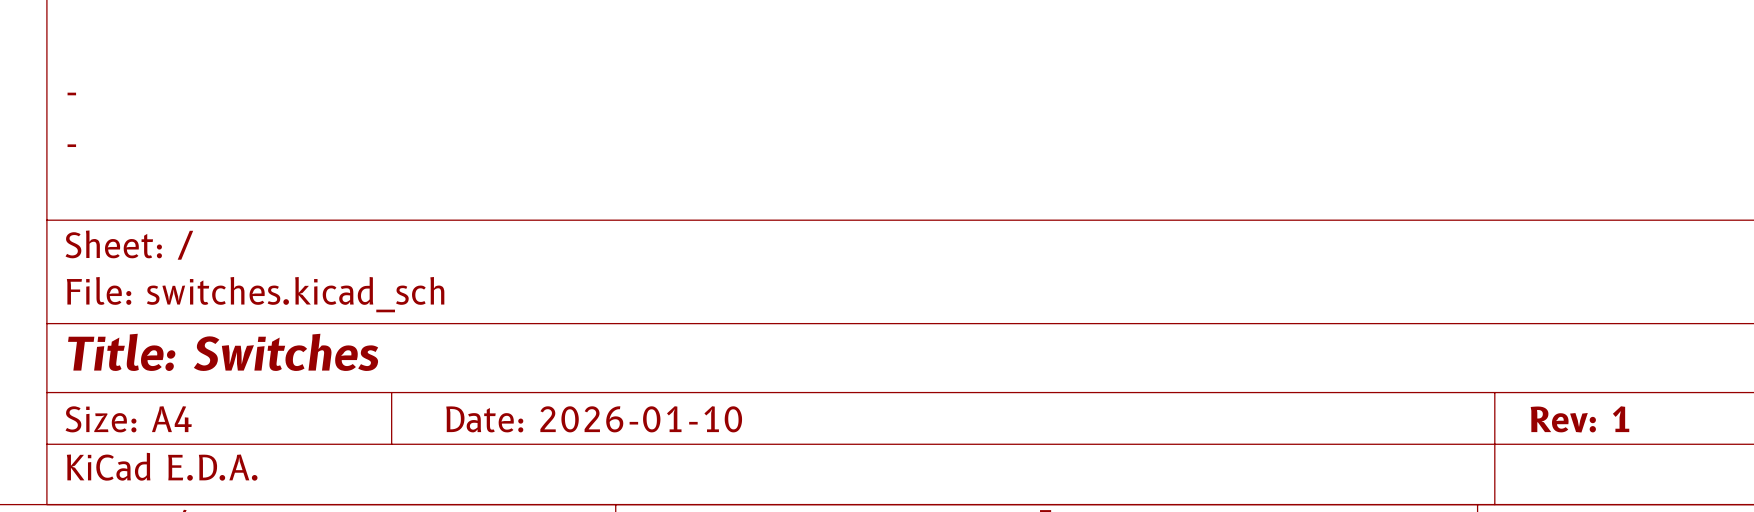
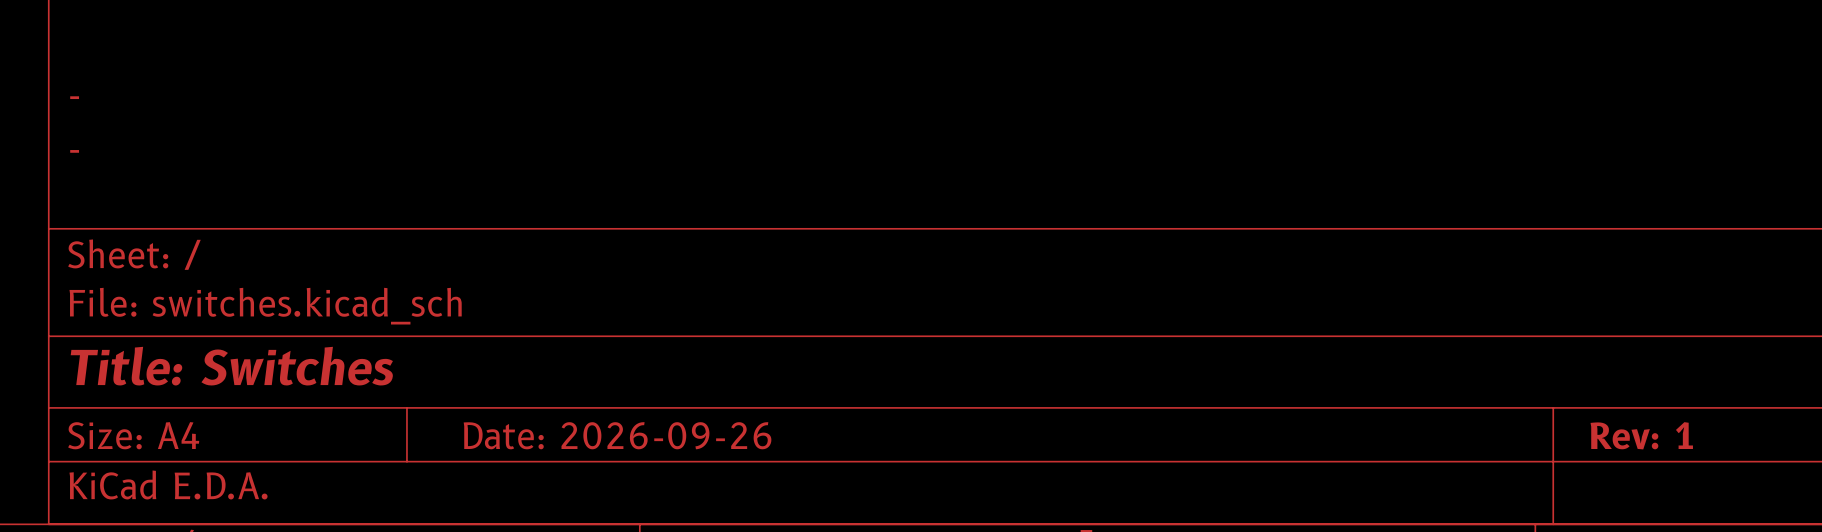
title block: Date: 2026-01-10 (594, 419) -> Date: 2026-09-26 (617, 435)

